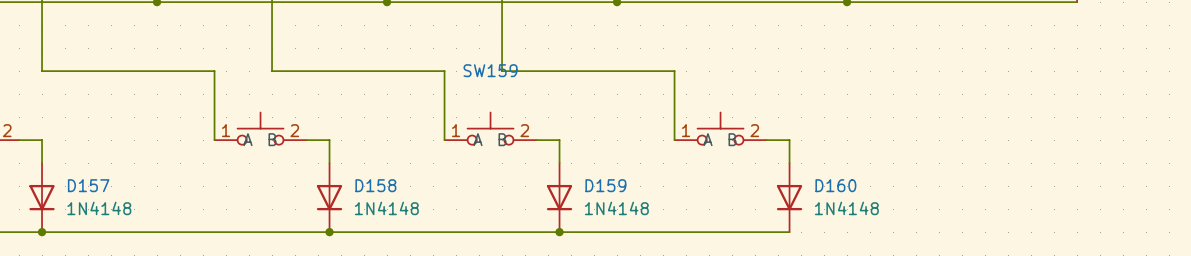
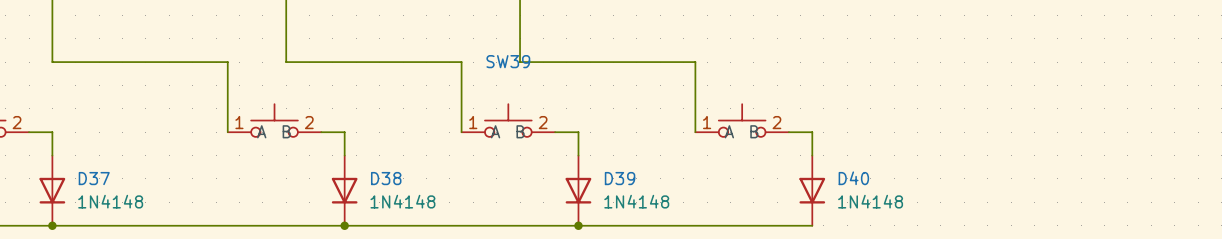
SW159 name: SW159 (490, 70) -> SW39 (508, 61)
D157 name: D157 (88, 185) -> D37 (94, 178)
D158 name: D158 (375, 185) -> D38 (386, 178)
D159 name: D159 (605, 185) -> D39 (620, 178)
D160 name: D160 (835, 185) -> D40 (853, 178)

